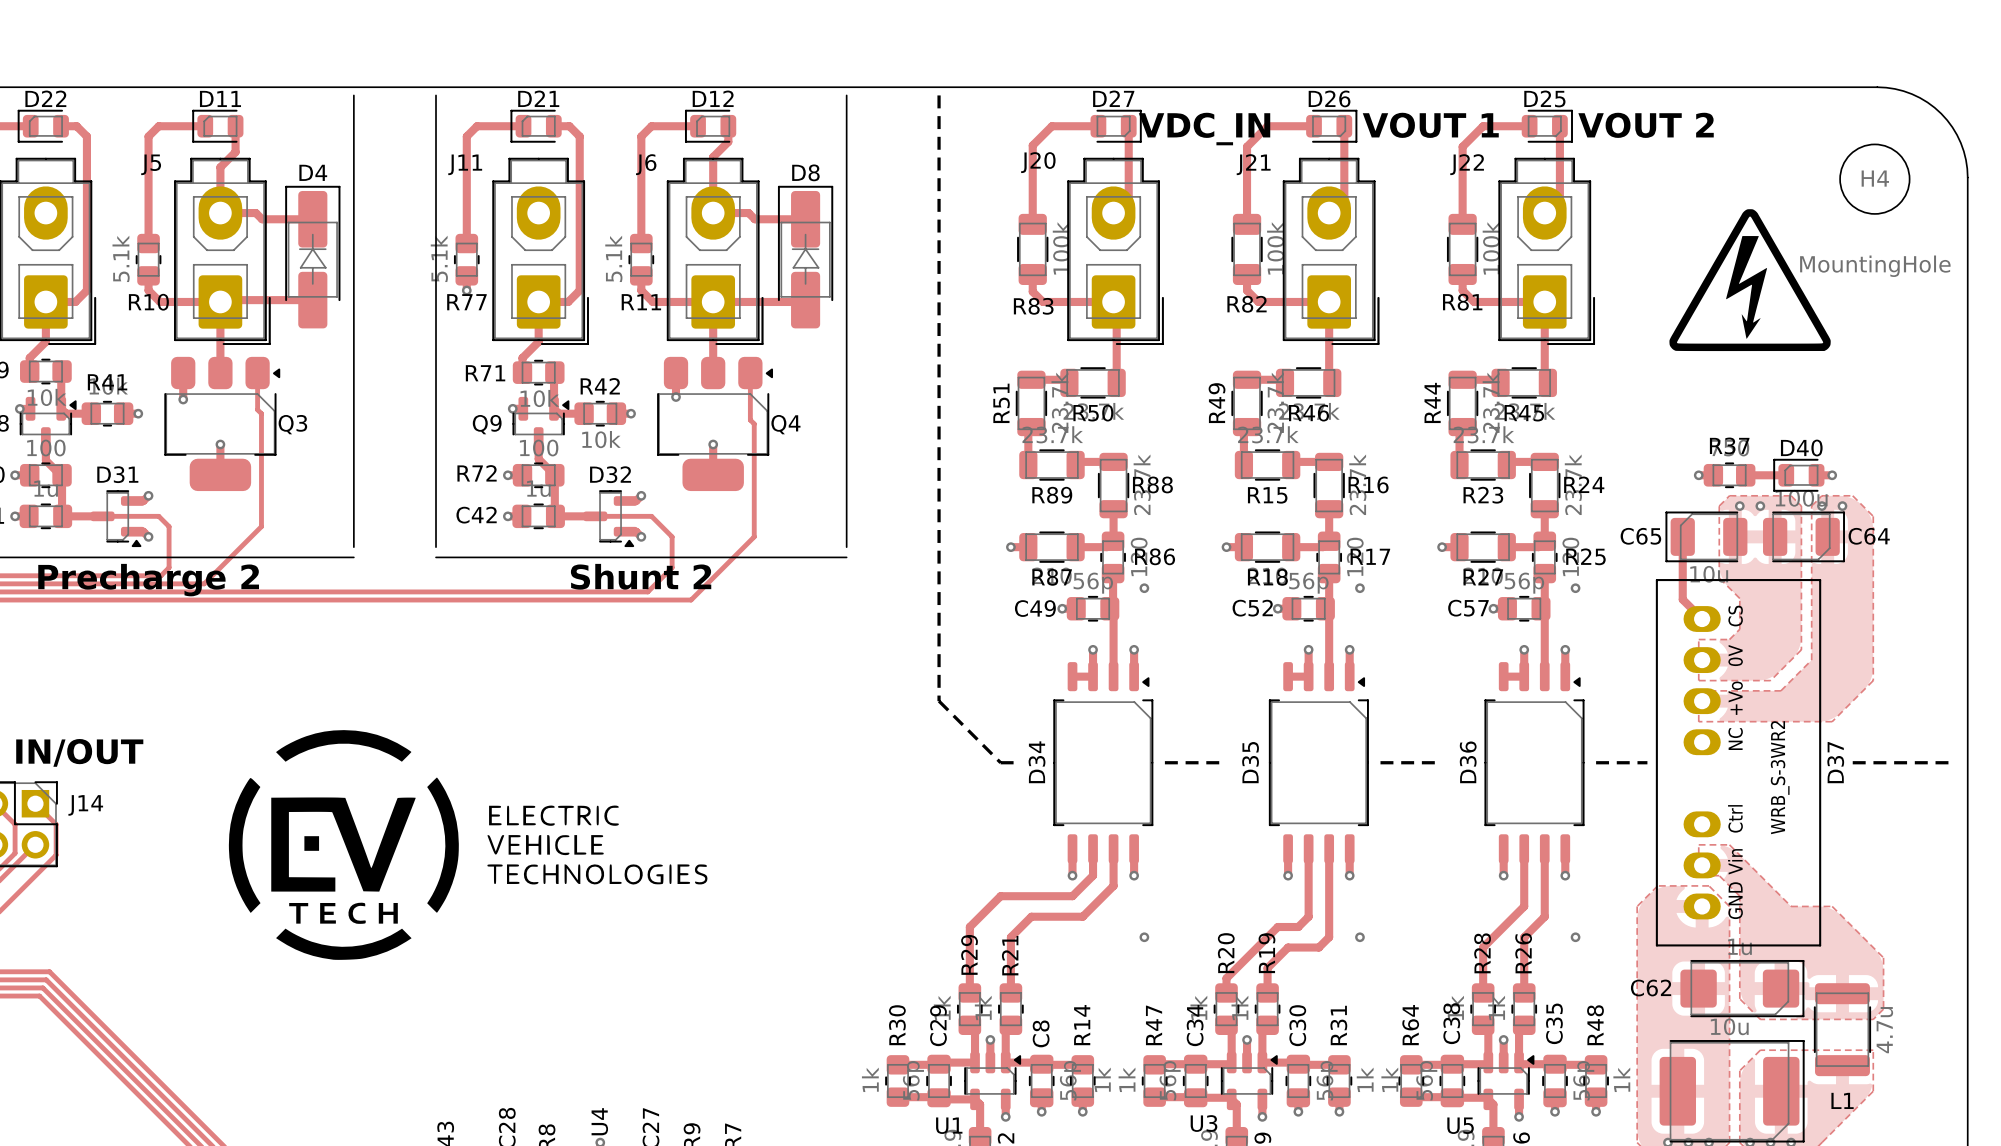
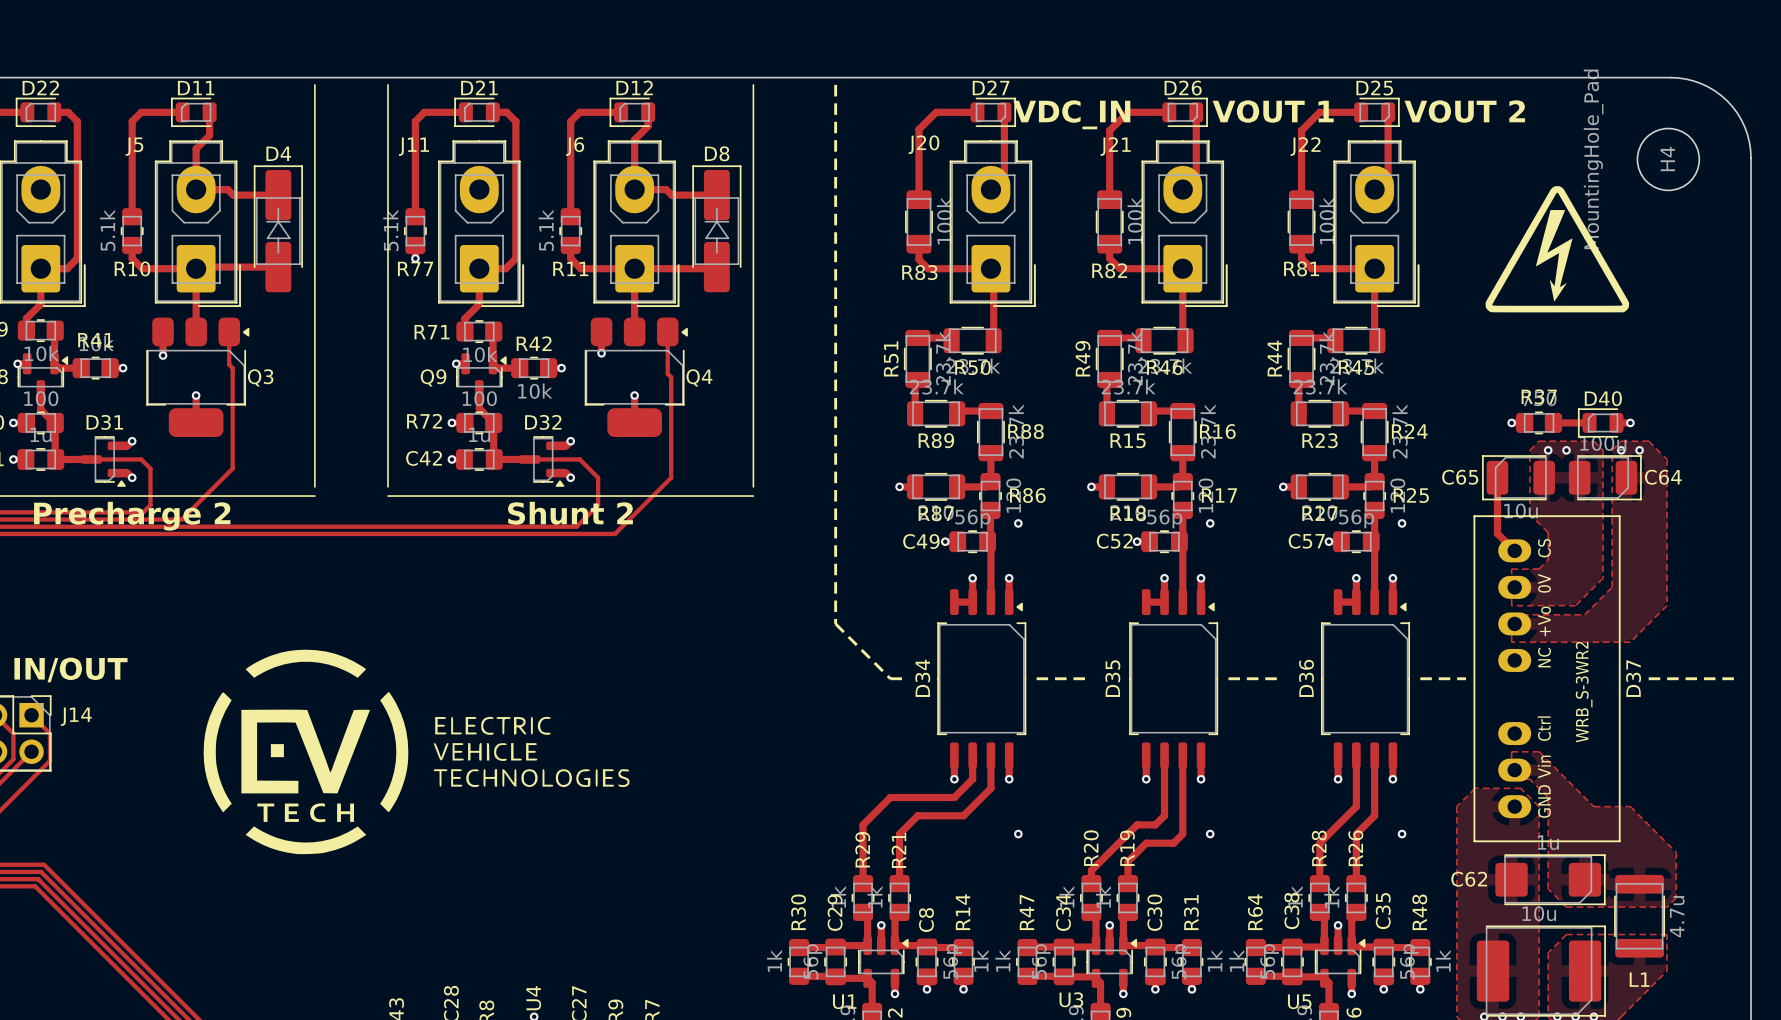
H4 name rotation: 0° (1875, 178) -> 90° counterclockwise (1667, 159)
H4 value: MountingHole (1875, 266) -> MountingHole_Pad (1593, 159)

